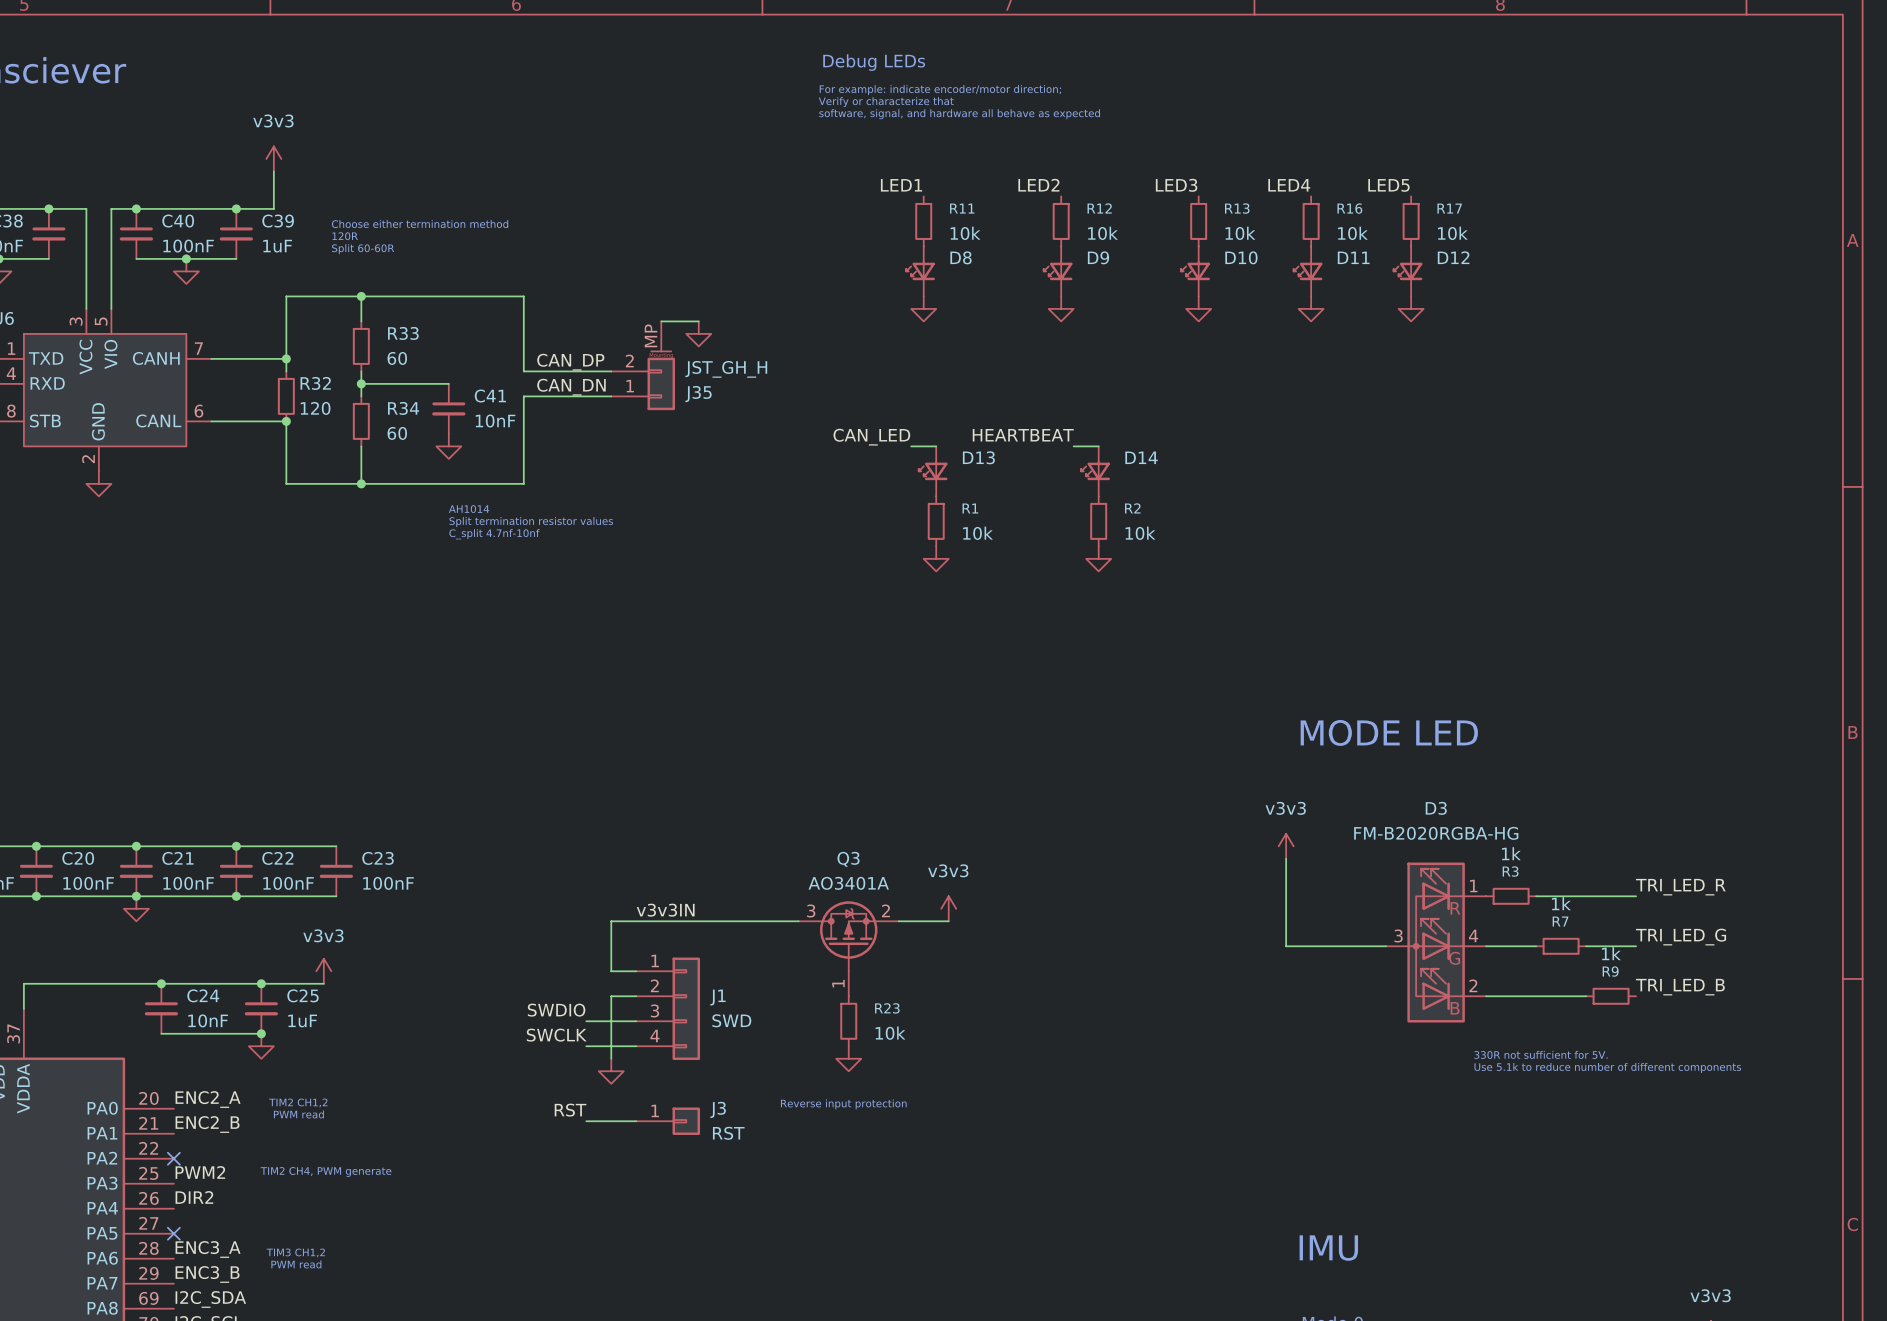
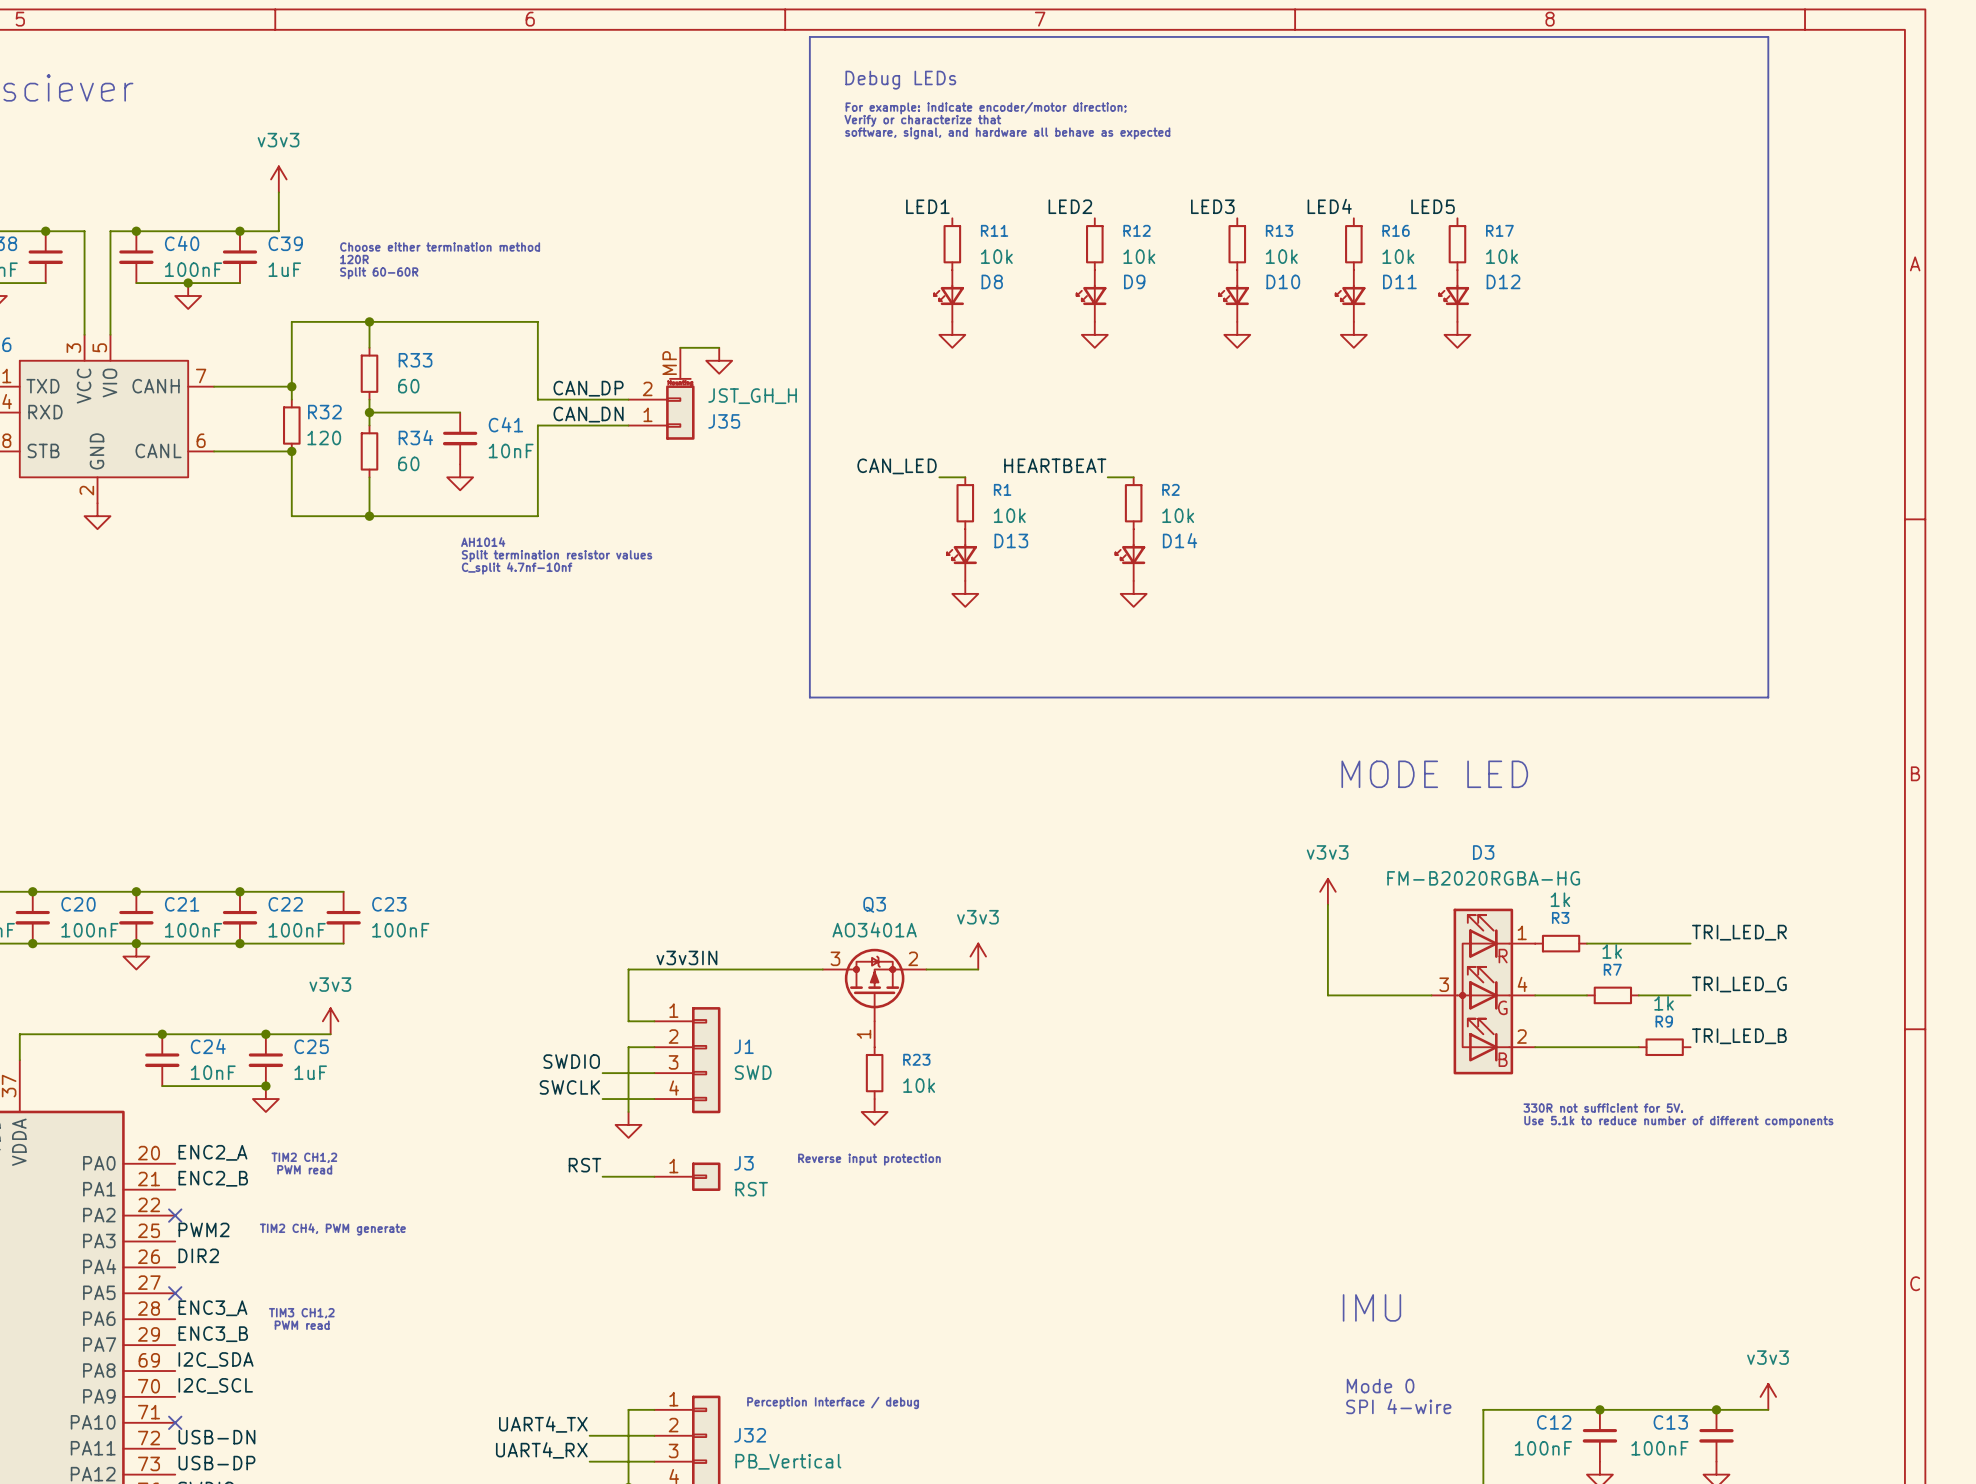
line: none -> (809, 36) (1768, 36) (1768, 697) (809, 697) (809, 36)
D13 position: (933, 471) -> (962, 555)
D14 position: (1095, 471) -> (1130, 555)
R1 position: (936, 521) -> (965, 503)
R2 position: (1098, 521) -> (1133, 503)

